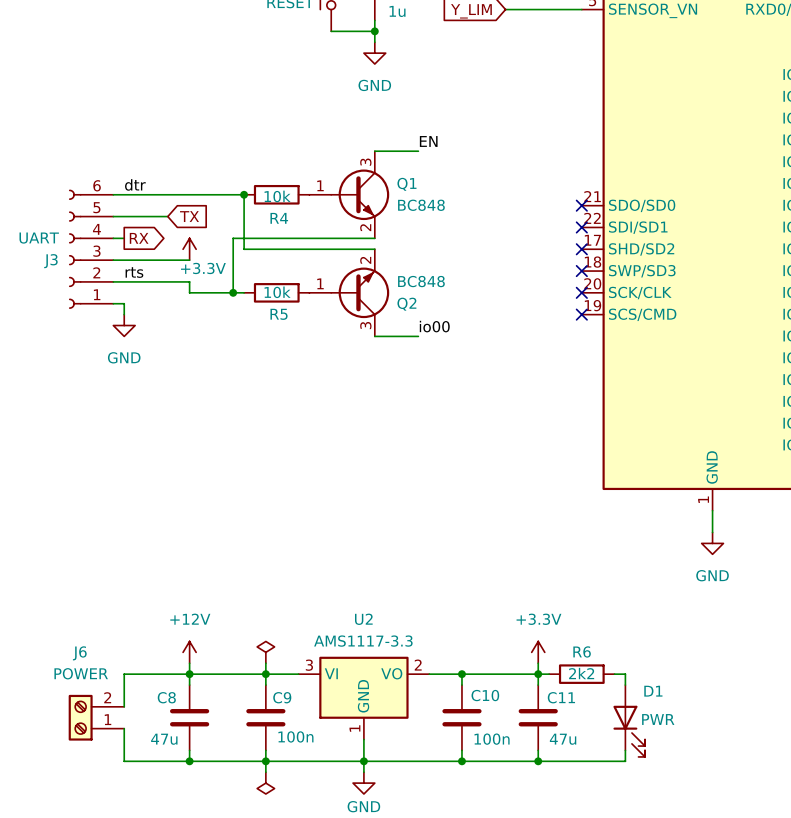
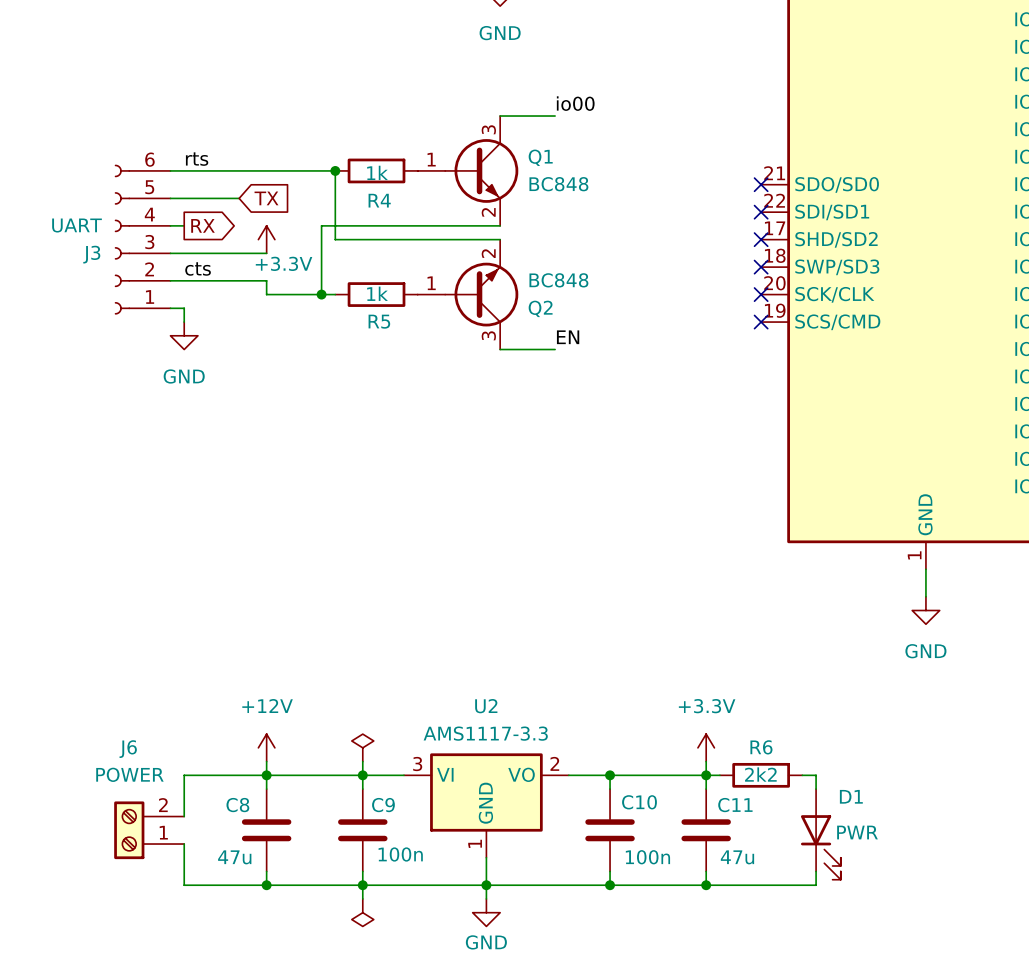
label: EN (428, 141) -> io00 (575, 103)
label: dtr (135, 184) -> rts (197, 159)
R4 value: 10k (277, 196) -> 1k (377, 172)
label: rts (134, 272) -> cts (198, 268)
R5 value: 10k (277, 292) -> 1k (377, 293)
label: io00 (434, 326) -> EN (568, 337)

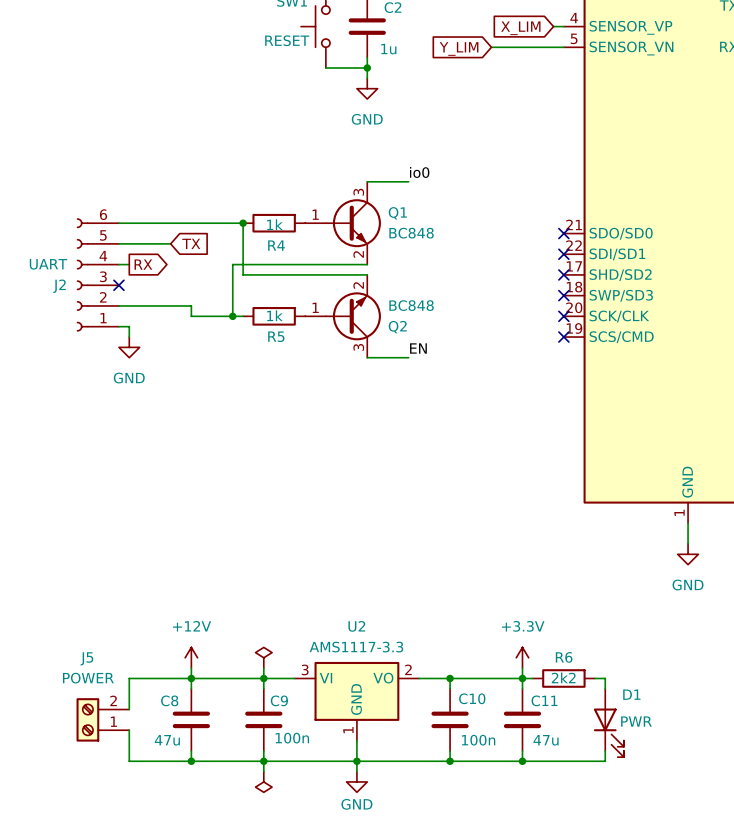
label: io00 (575, 103) -> io0 (419, 172)
label: rts (197, 159) -> none
power symbol: +3.3V (266, 239) -> none
wire: (170, 253) (266, 253) -> none
no-connect mark: none -> (118, 285)
J3 name: J3 (91, 254) -> J2 (59, 286)
label: cts (198, 268) -> none
J6 name: J6 (128, 749) -> J5 (86, 658)

